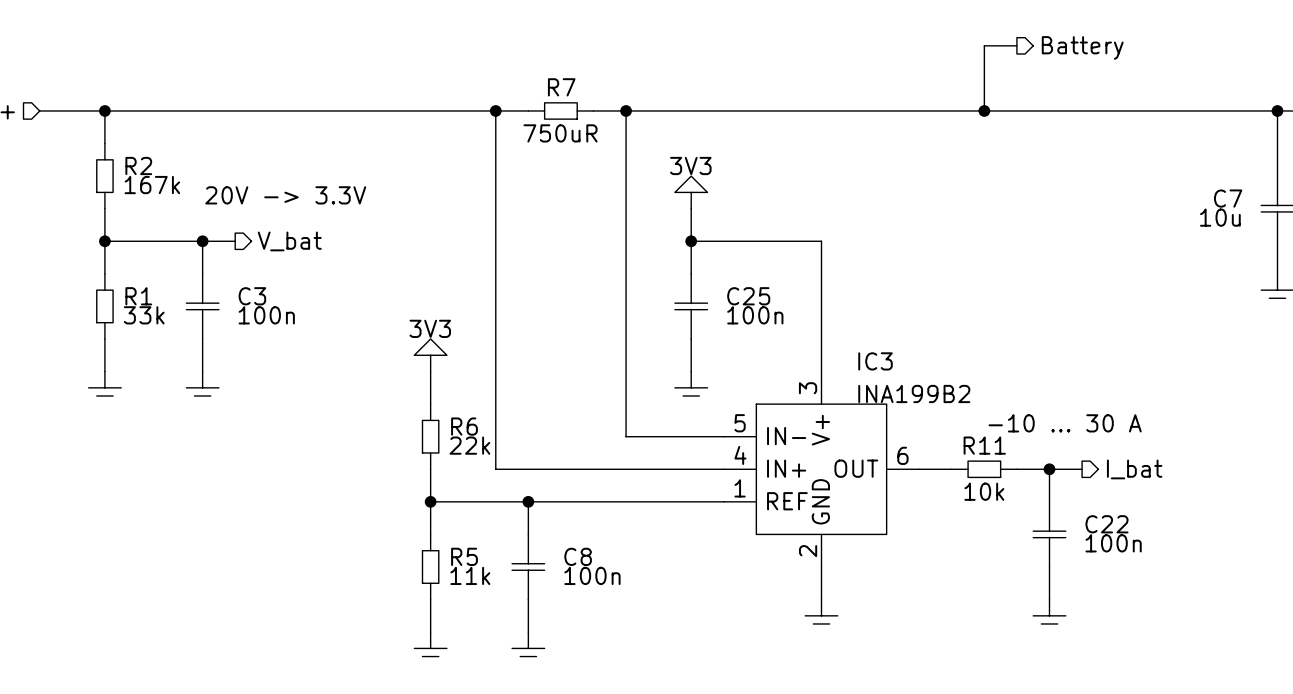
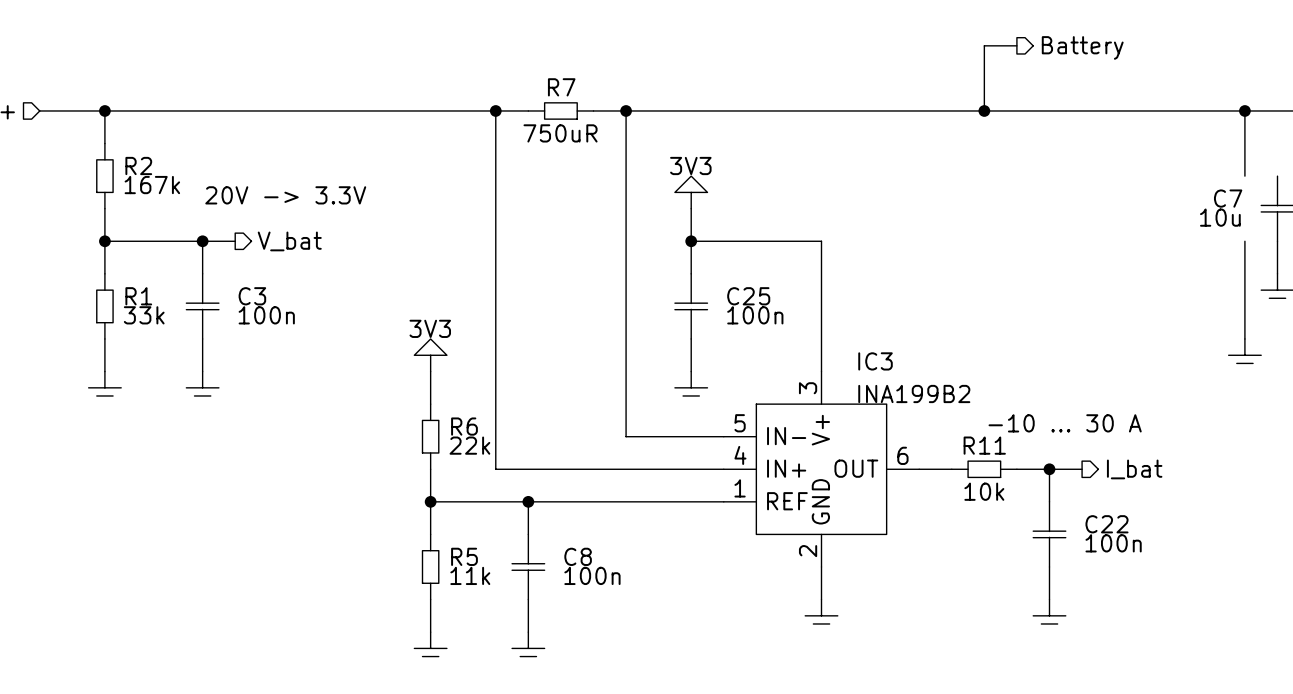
junction: none -> (1244, 110)
wire: (1277, 110) (1277, 176) -> (1244, 110) (1244, 176)
junction: (1277, 110) -> none
wire: none -> (1244, 241) (1244, 338)
power symbol: none -> (1244, 355)

